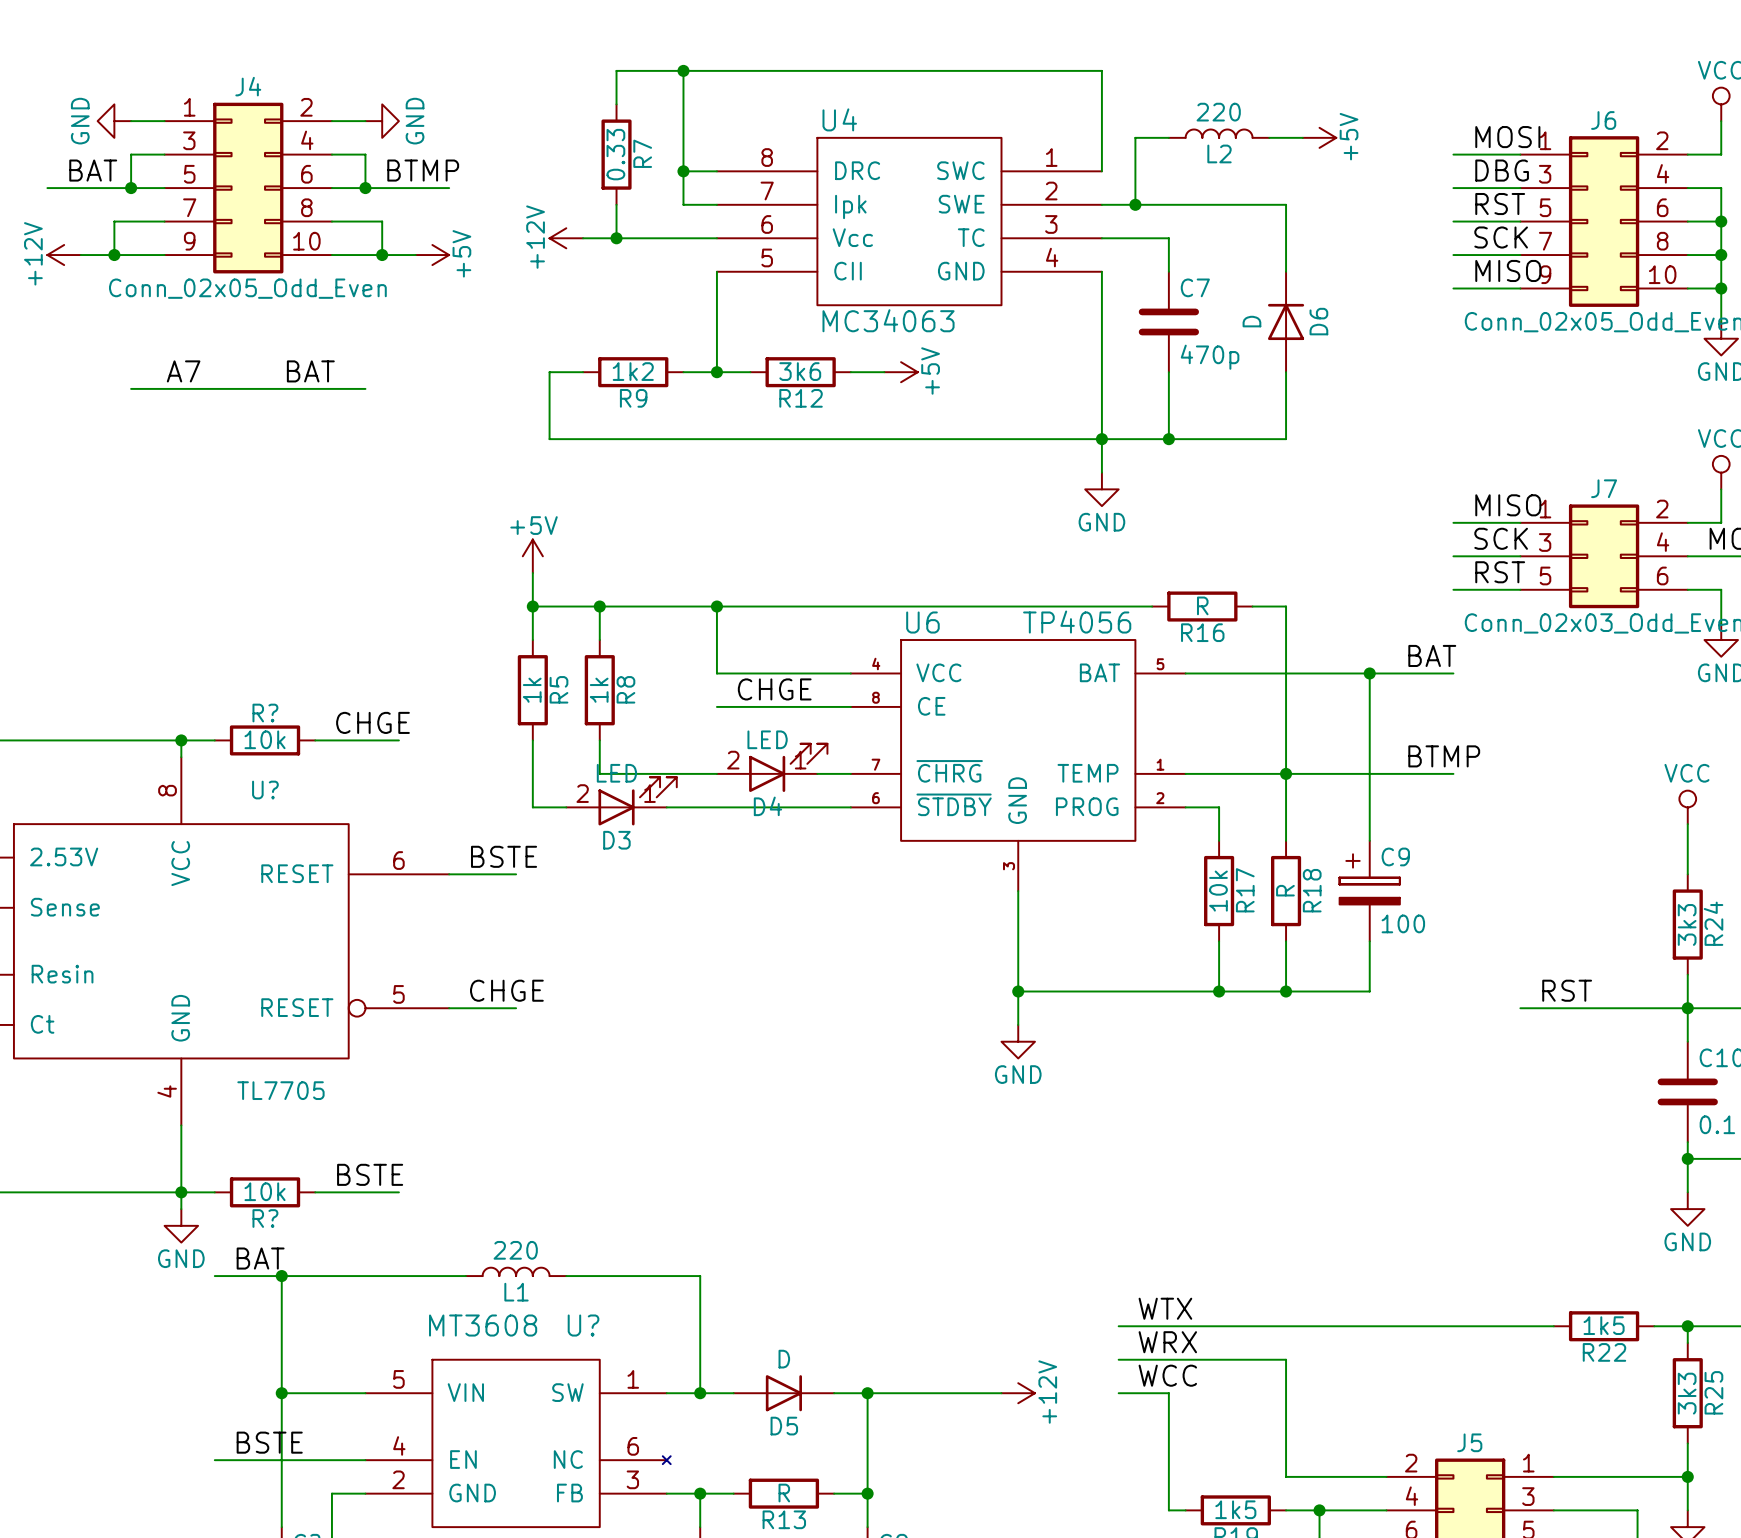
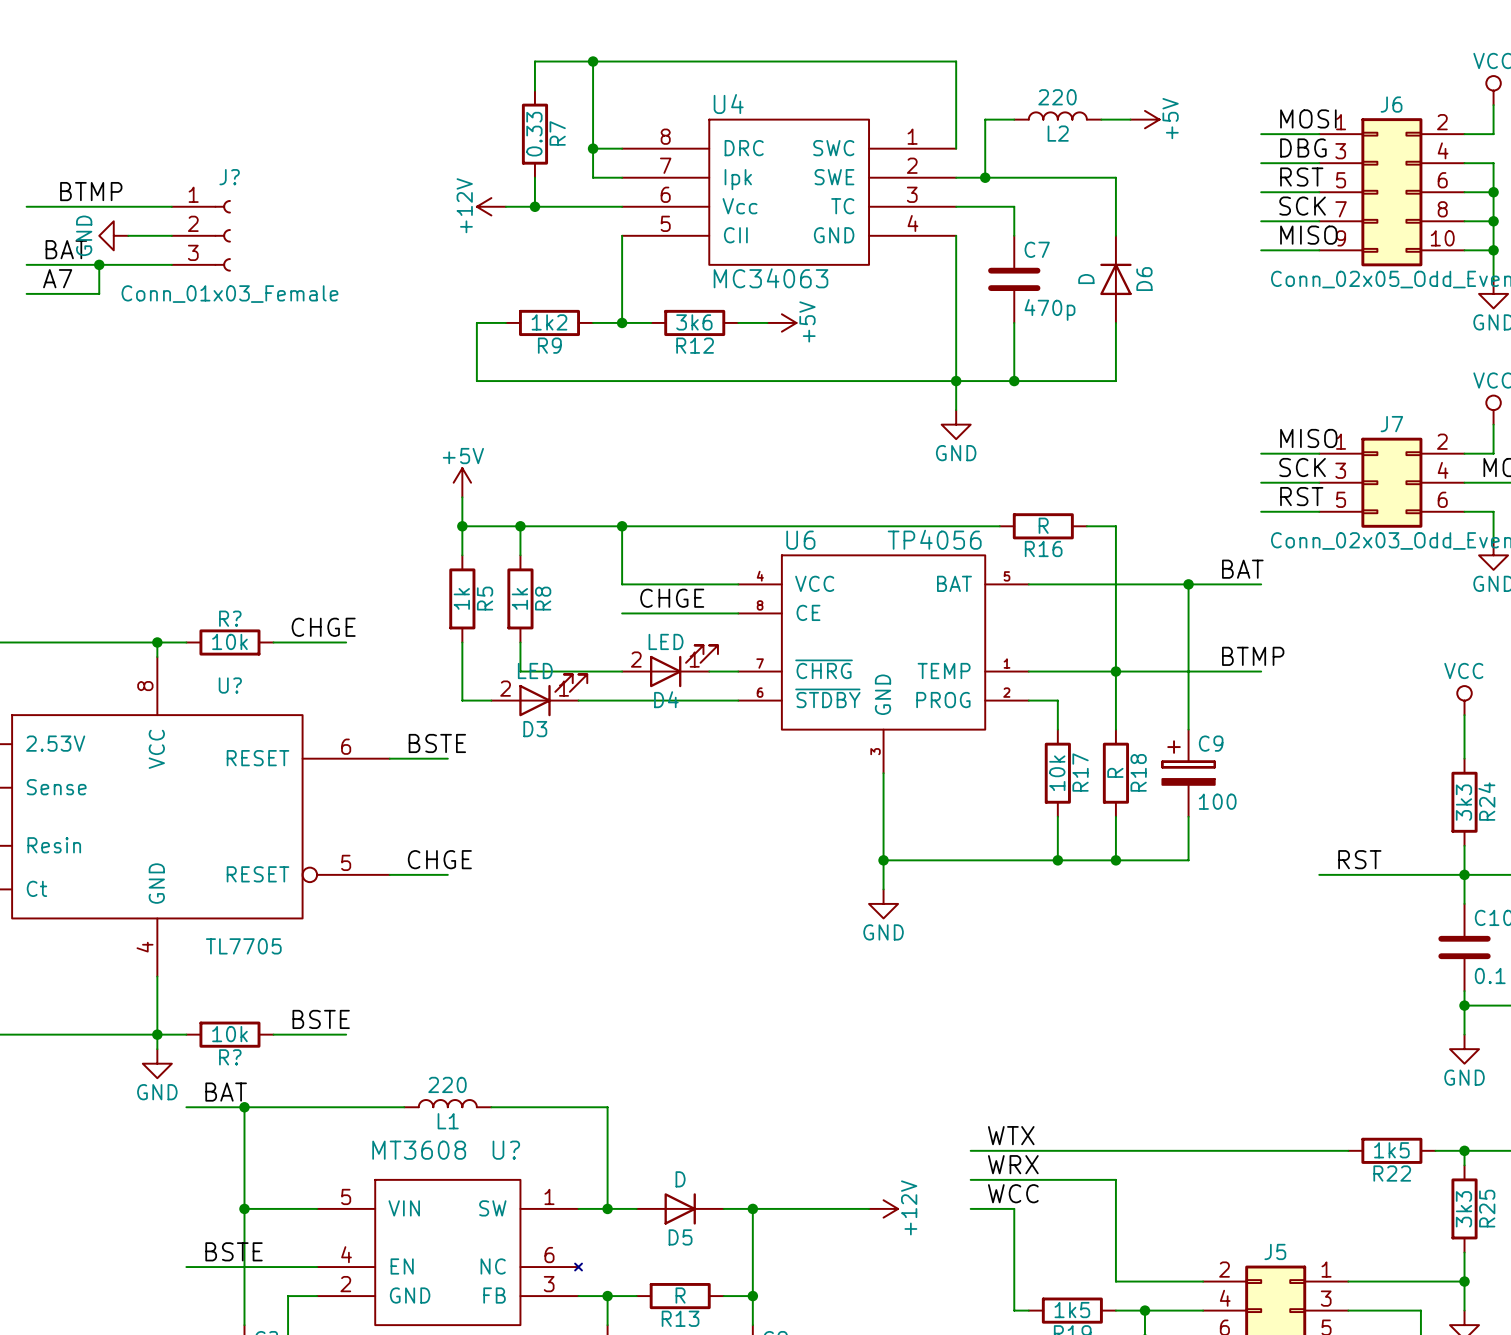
power symbol: GND (114, 121) -> none
wire: (131, 121) (164, 121) -> none
wire: (331, 121) (365, 121) -> none
power symbol: GND (382, 121) -> none
wire: (164, 154) (131, 154) (131, 188) -> none
wire: (331, 154) (365, 154) (365, 188) -> none
label position: BAT (93, 170) -> BAT (66, 249)
label position: BTMP (423, 170) -> BTMP (91, 191)
wire: (47, 188) (164, 188) -> none
junction: (131, 188) -> none
J4: Conn_02x05_Odd_Even (248, 188) -> none
wire: (331, 188) (449, 188) -> none
junction: (365, 188) -> none
wire: (164, 221) (114, 221) (114, 255) -> none
wire: (331, 221) (382, 221) (382, 255) -> none
wire: none -> (26, 206) (171, 206)
power symbol: +12V (64, 255) -> none
wire: (80, 255) (164, 255) -> none
junction position: (114, 255) -> (99, 264)
wire: (331, 255) (415, 255) -> none
junction: (382, 255) -> none
power symbol: +5V (432, 255) -> none
power symbol: none -> GND (113, 235)
wire: none -> (128, 235) (171, 235)
J?: none -> Conn_01x03_Female (201, 235)
wire: none -> (26, 264) (171, 264)
wire: none -> (99, 264) (99, 293) (26, 293)
label position: A7 (183, 371) -> A7 (57, 278)
label: BAT (310, 371) -> none
wire: (131, 388) (365, 388) -> none

